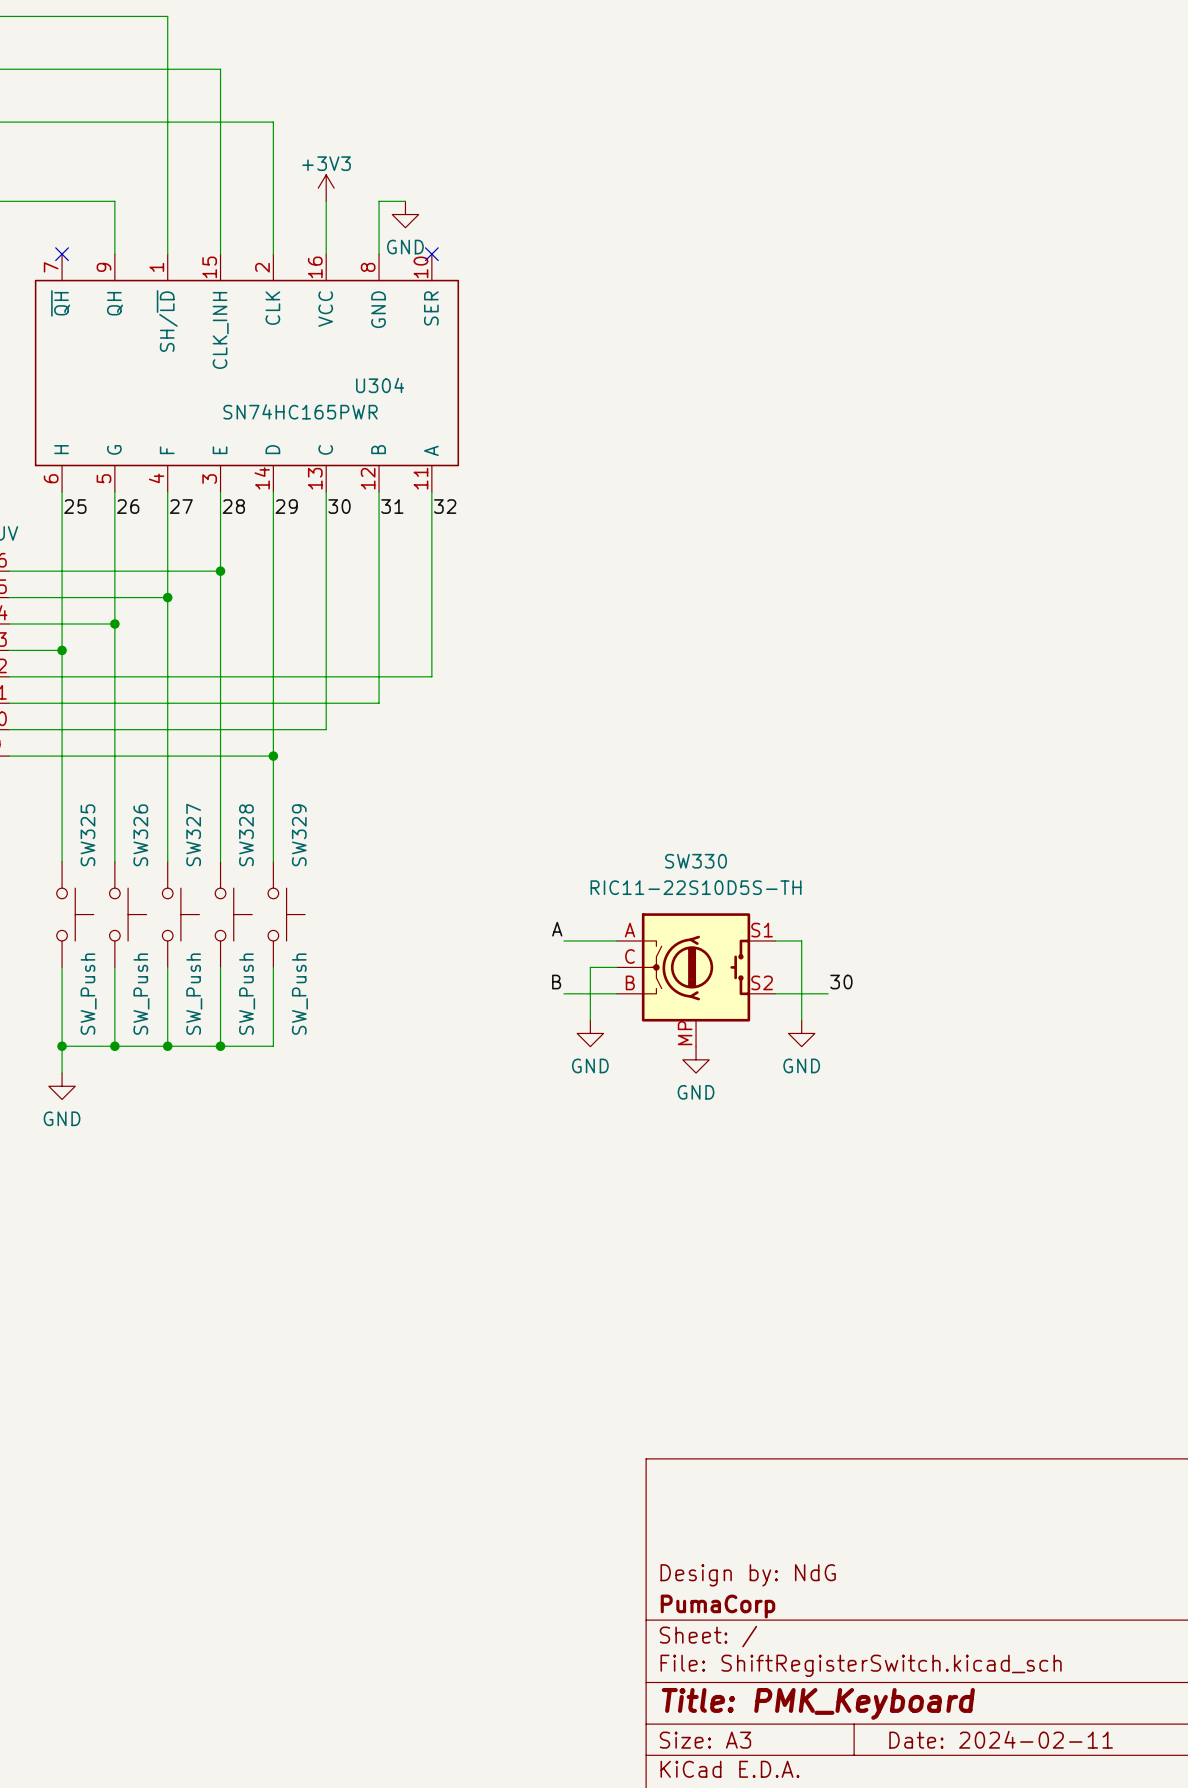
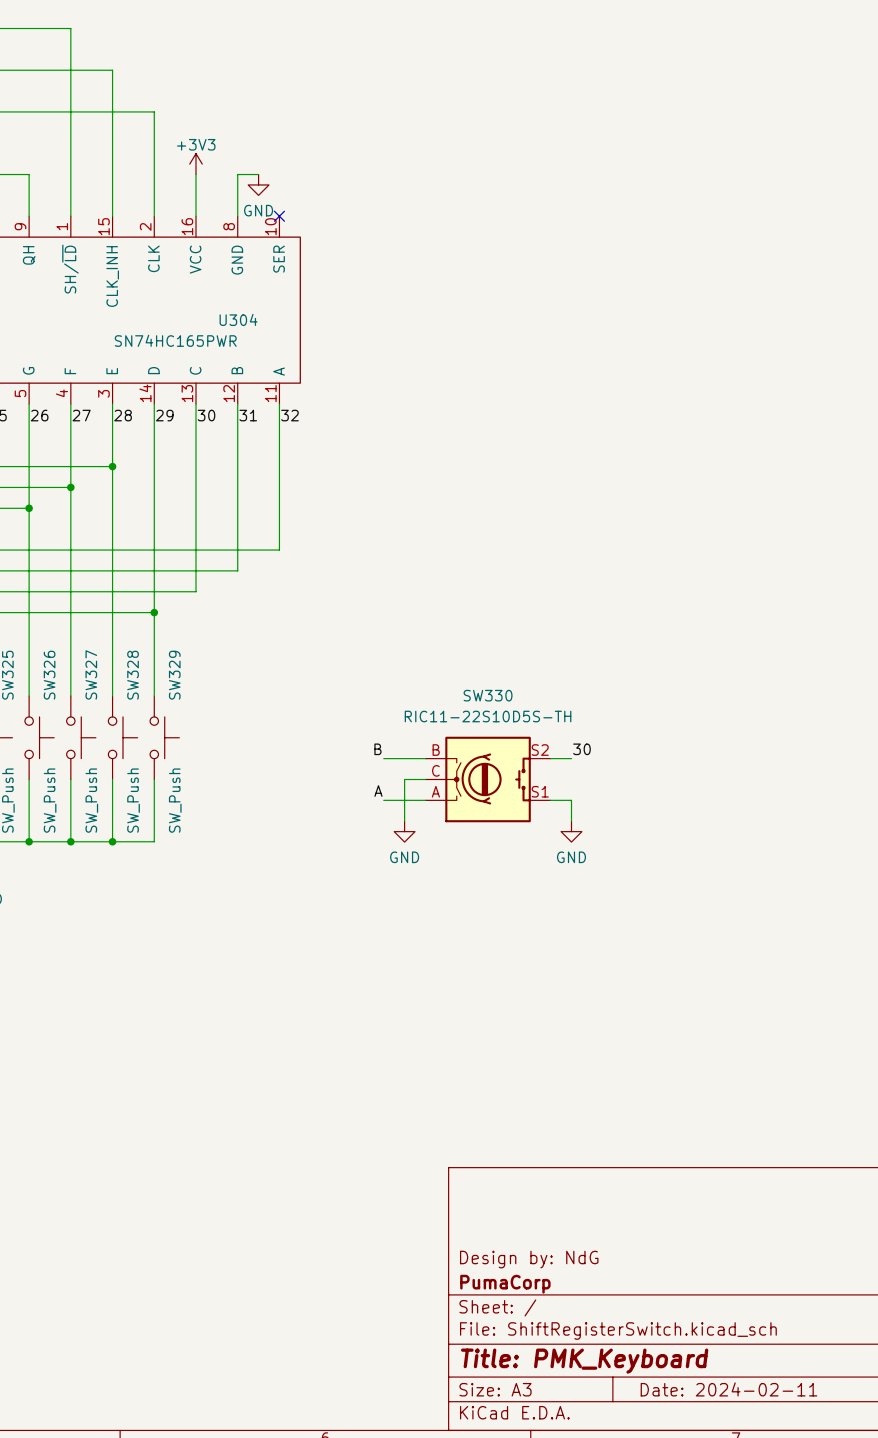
SW330 symbol: [616, 913, 776, 1047] -> [425, 736, 551, 823]
label: A (557, 929) -> B (377, 749)
wire: (801, 940) (801, 993) (828, 993) -> none
label: B (556, 982) -> A (378, 791)
label position: 30 (841, 982) -> 30 (582, 749)
power symbol: GND (696, 1059) -> none

